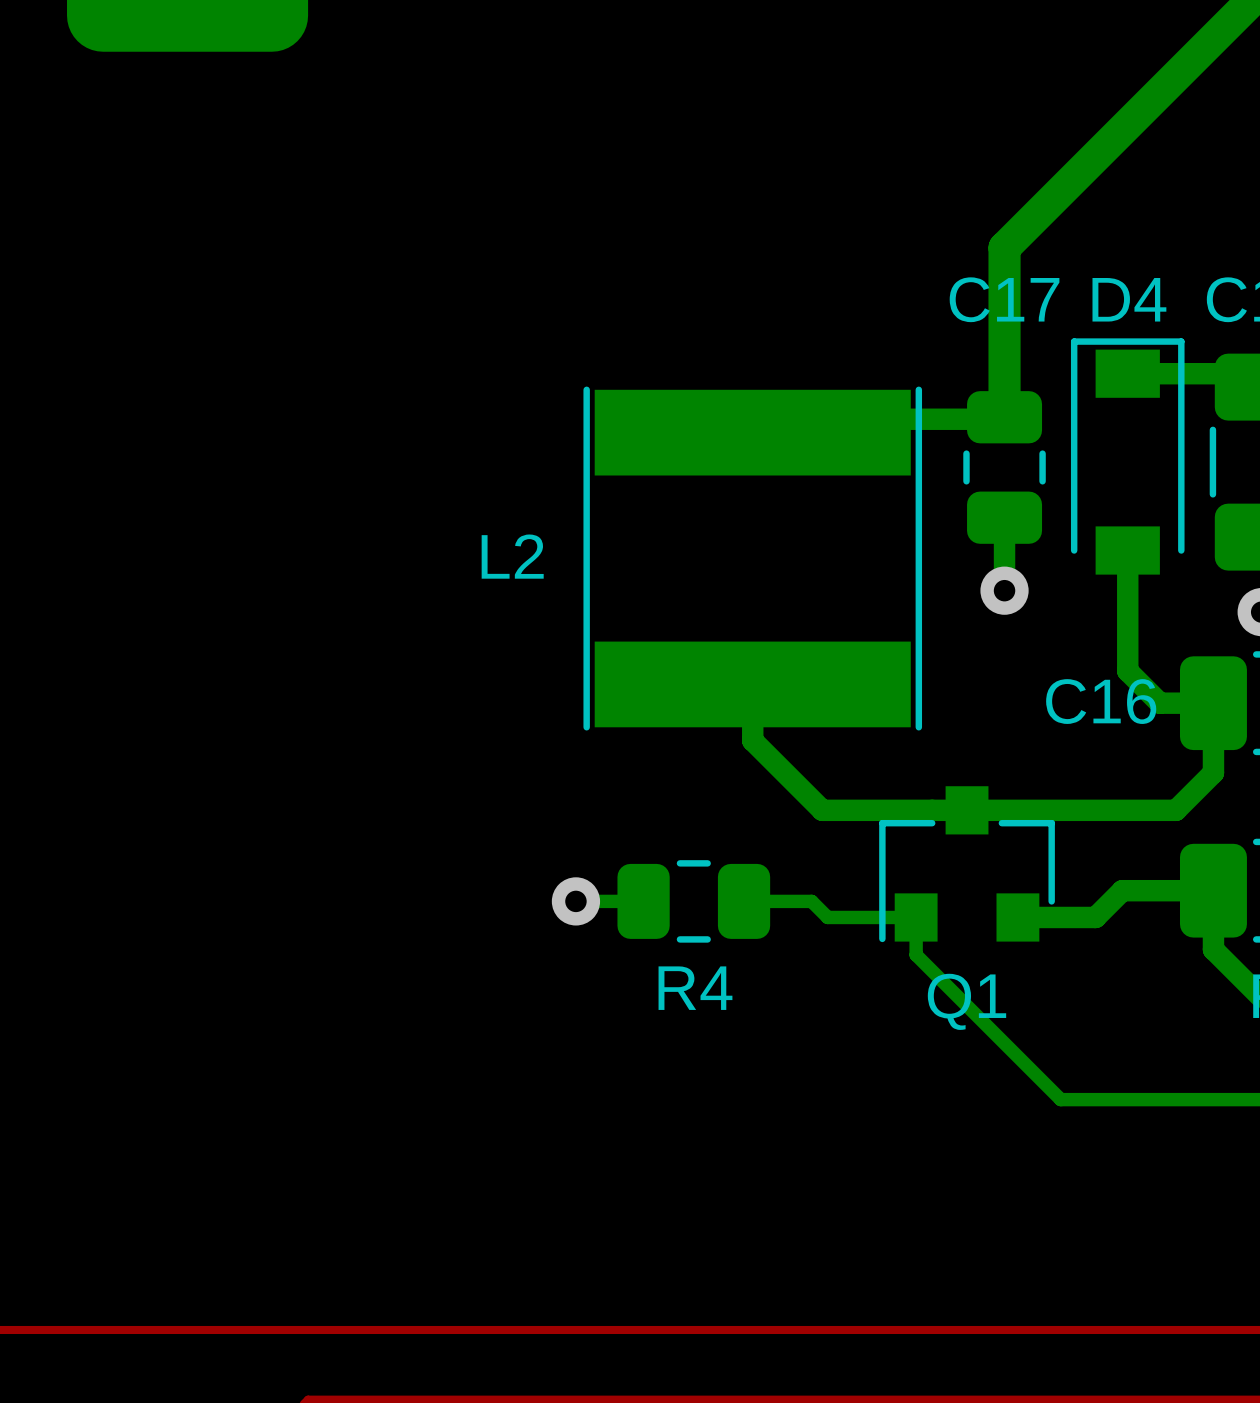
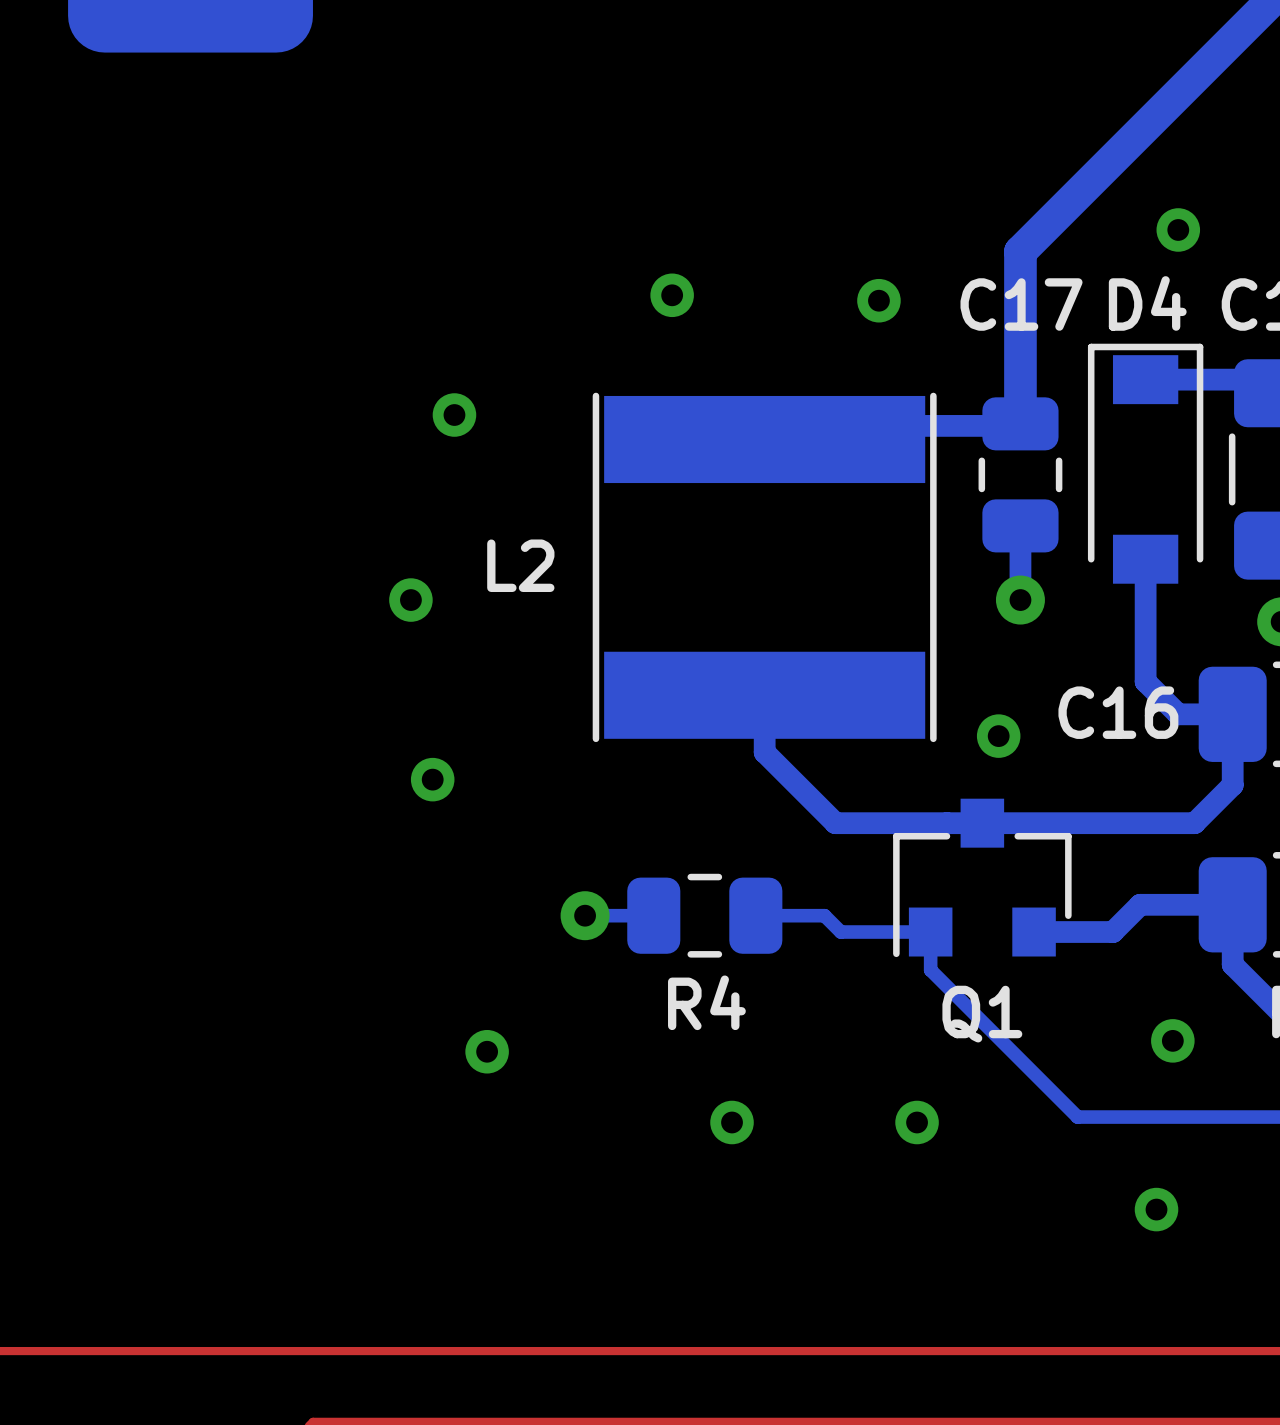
via: none -> (1178, 229)
via: none -> (672, 295)
via: none -> (878, 300)
via: none -> (454, 415)
via: none -> (410, 600)
via: none -> (998, 736)
via: none -> (432, 779)
via: none -> (1172, 1040)
via: none -> (487, 1051)
via: none -> (732, 1122)
via: none -> (917, 1122)
via: none -> (1156, 1209)

